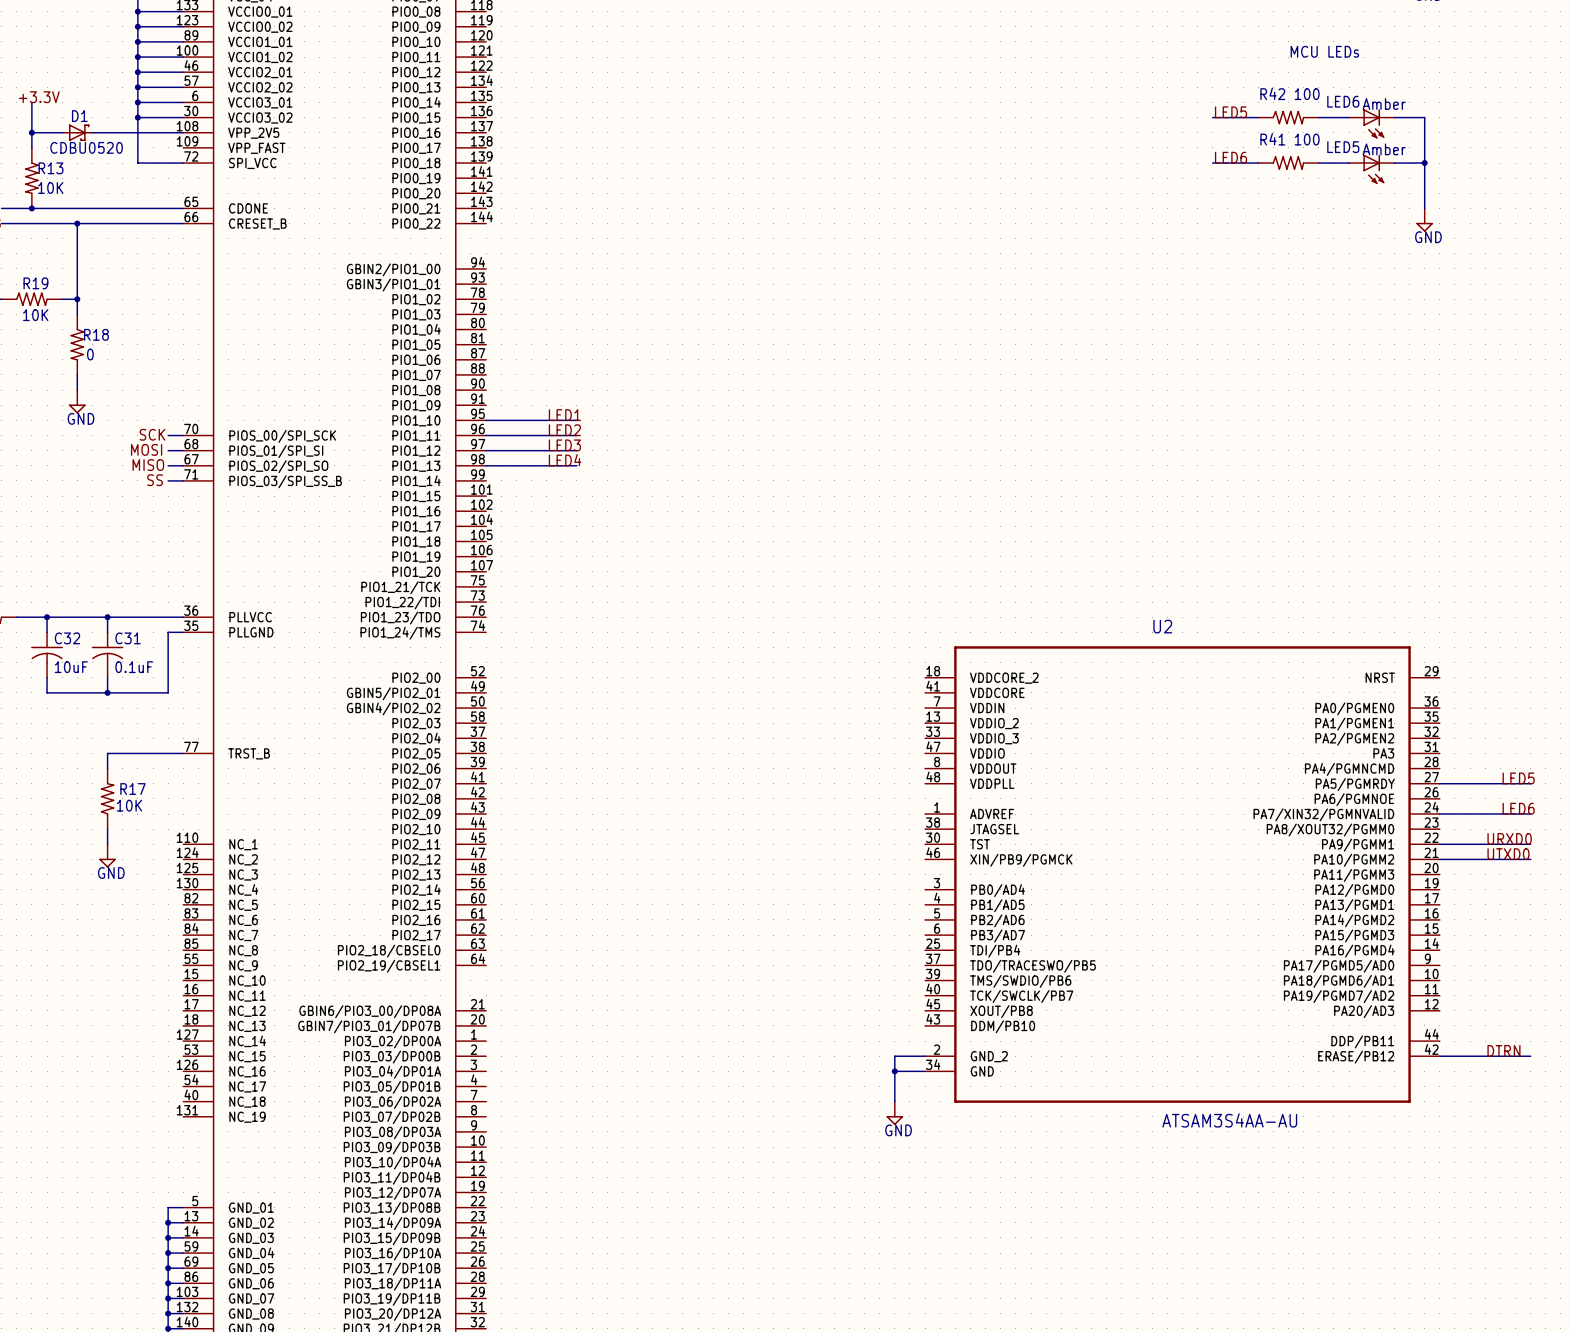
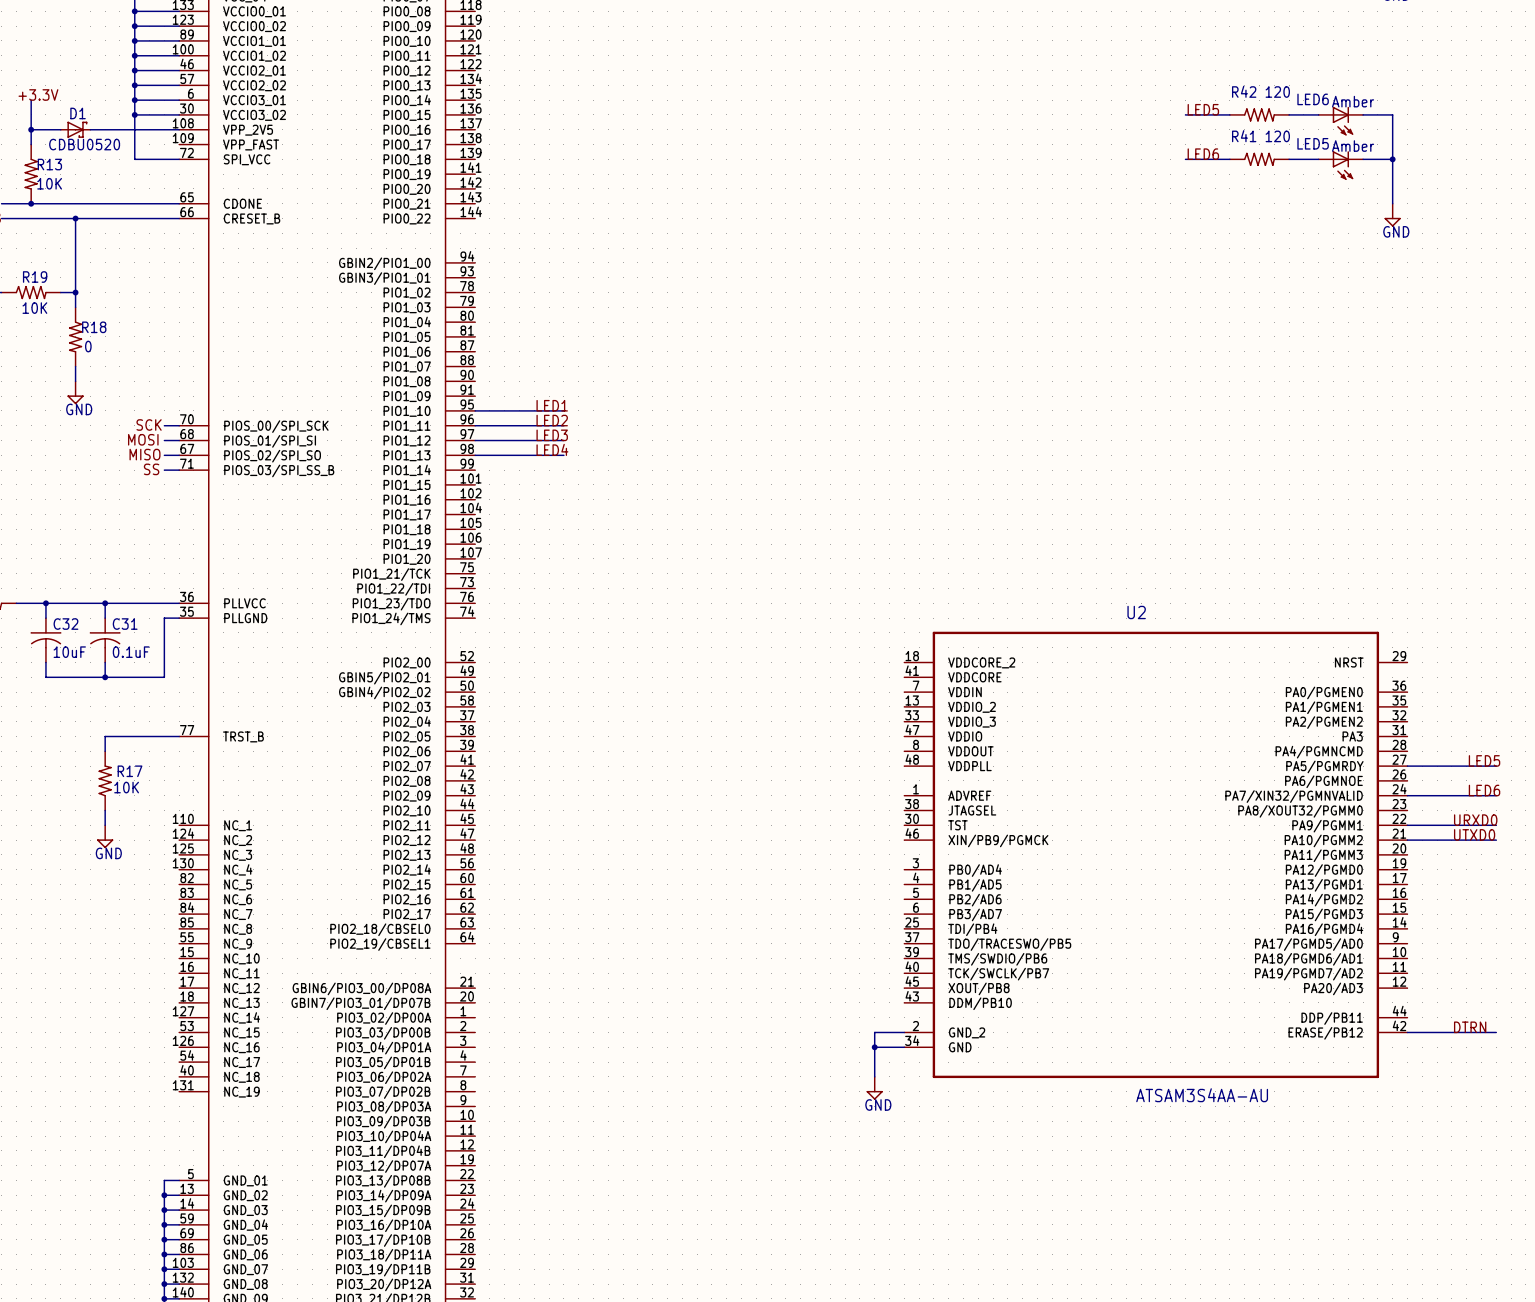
text: MCU LEDs (1324, 51) -> none
R42 value: 100 (1307, 94) -> 120 (1277, 92)
R41 value: 100 (1307, 139) -> 120 (1277, 136)

